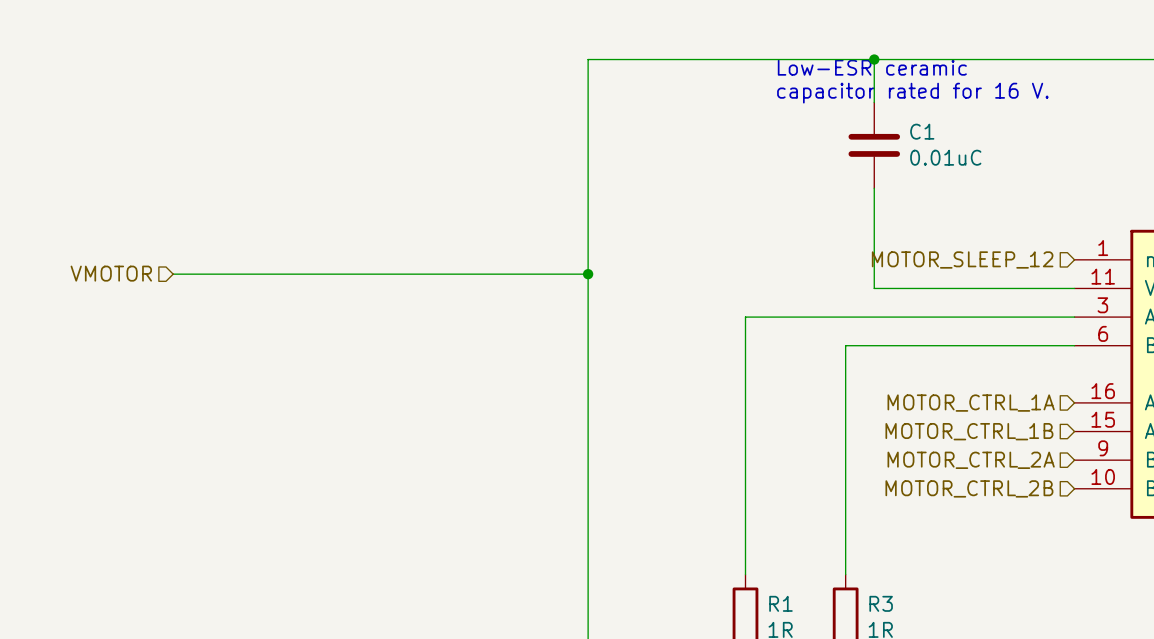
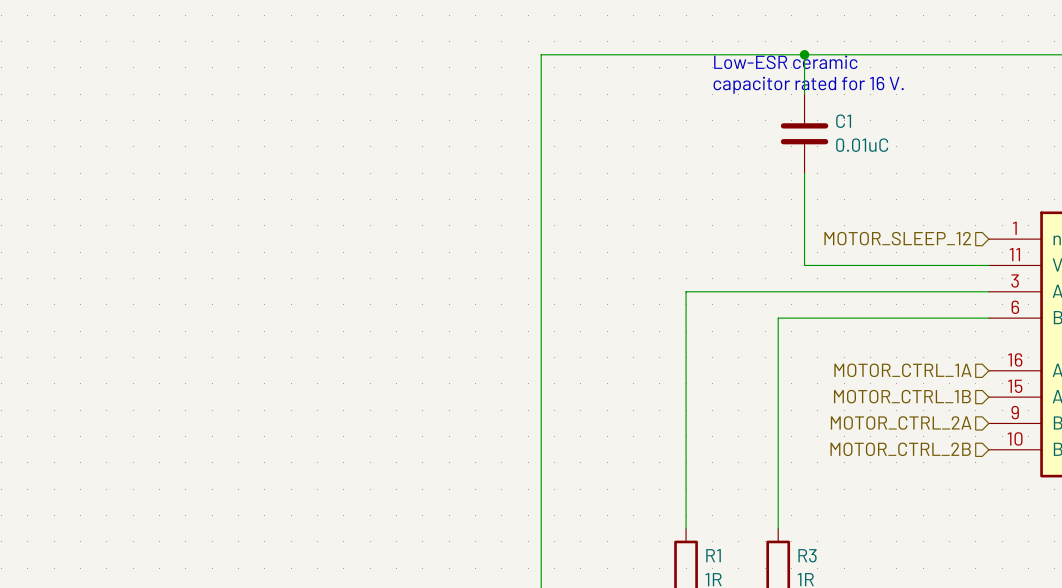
hierarchical label: VMOTOR (111, 273) -> none
wire: (173, 274) (588, 274) -> none
junction: (588, 274) -> none

